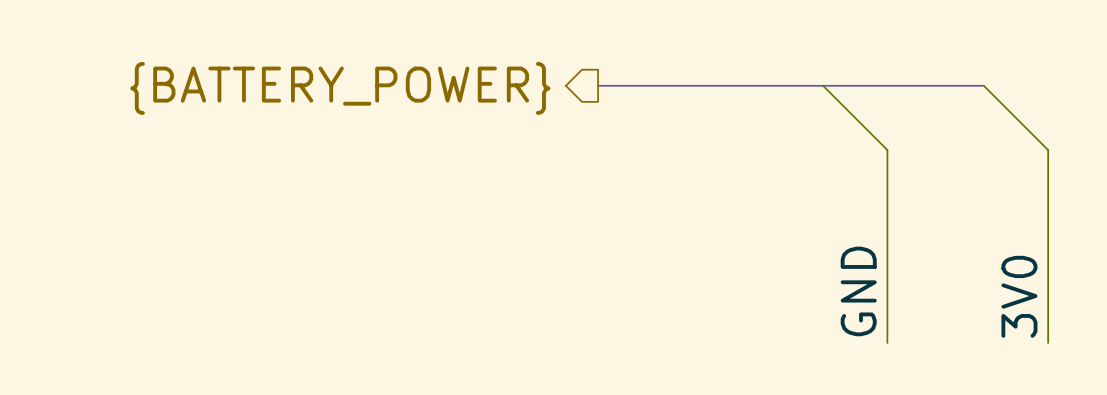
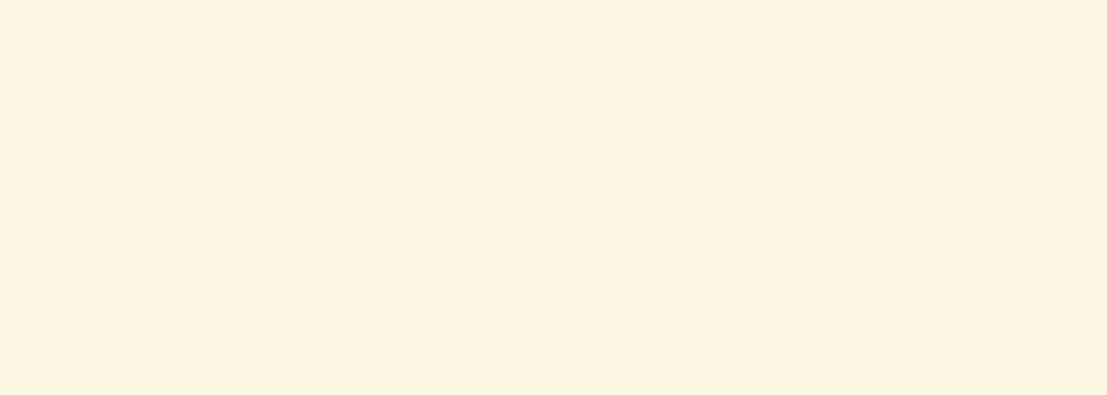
bus: (598, 85) (983, 85) -> none
wire: (823, 85) (887, 150) (887, 342) -> none
wire: (983, 85) (1048, 150) (1048, 342) -> none
hierarchical label: {BATTERY_POWER} (340, 88) -> none
label: GND (858, 291) -> none
label: 3V0 (1019, 296) -> none

